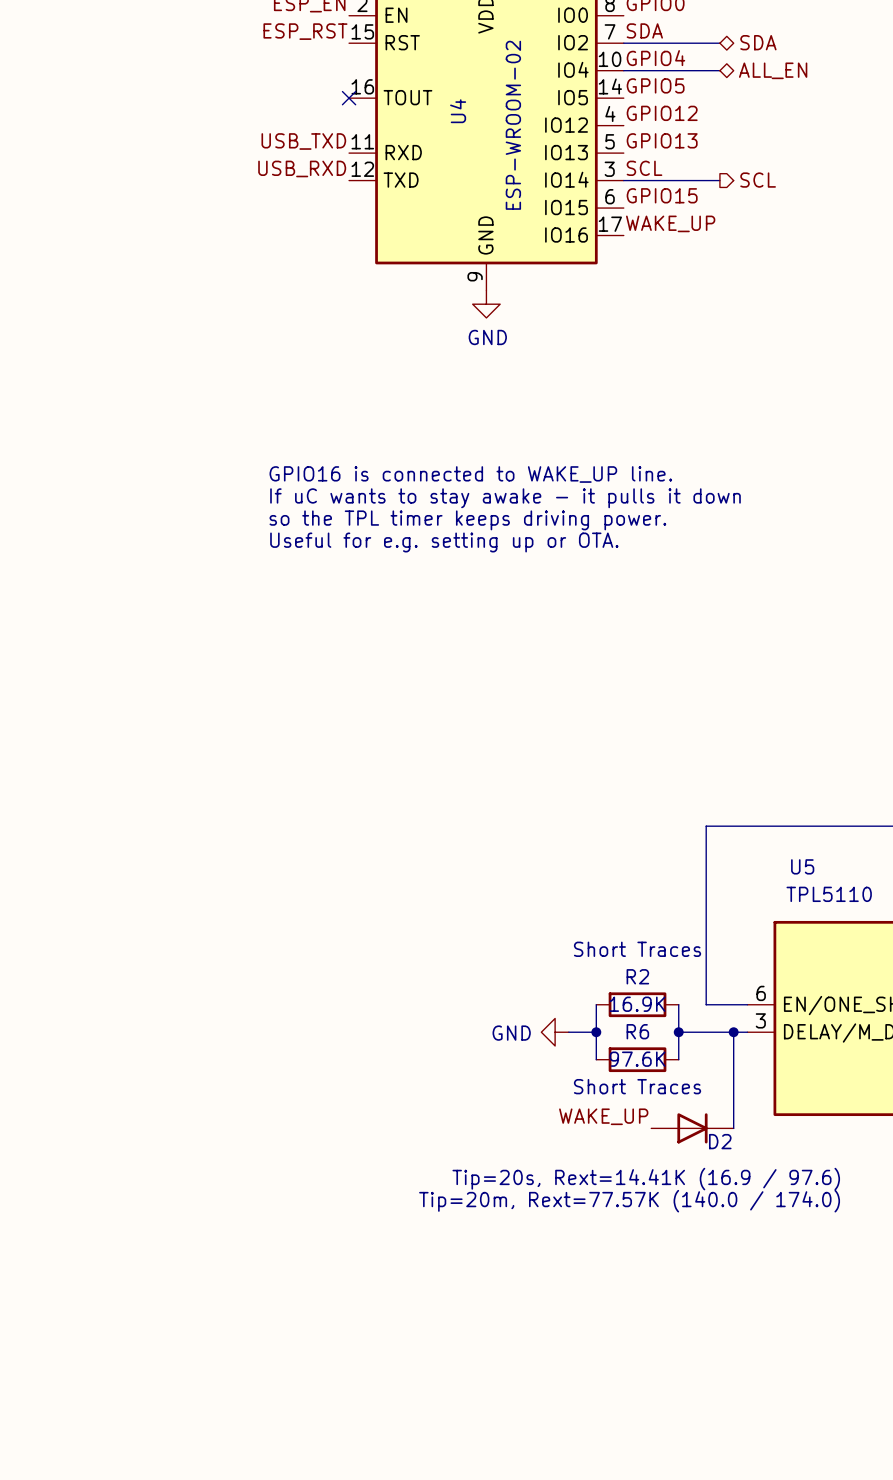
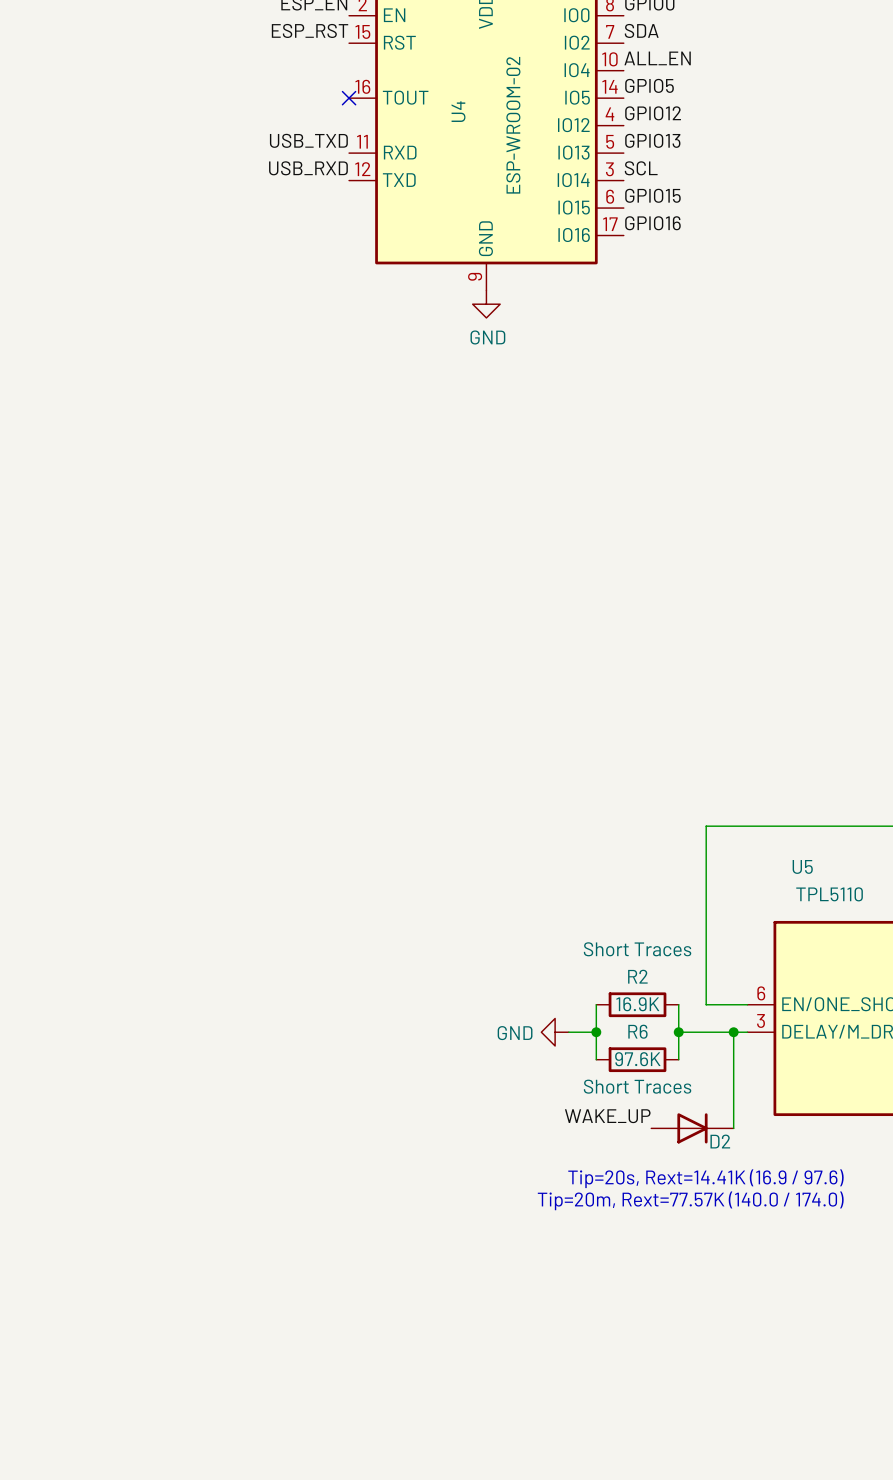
hierarchical label: SDA (758, 42) -> none
wire: (623, 43) (719, 43) -> none
label: GPIO4 (655, 58) -> ALL_EN (657, 58)
wire: (623, 70) (719, 70) -> none
hierarchical label: ALL_EN (773, 70) -> none
wire: (623, 180) (719, 180) -> none
hierarchical label: SCL (758, 180) -> none
label: WAKE_UP (670, 223) -> GPIO16 (652, 223)
text: GPIO16 is connected to WAKE_UP line. (470, 474) -> none
text: If uC wants to stay awake - it pulls it down (505, 498) -> none
text: so the TPL timer keeps driving power. (467, 520) -> none
text: Useful for e.g. setting up or OTA. (444, 542) -> none

